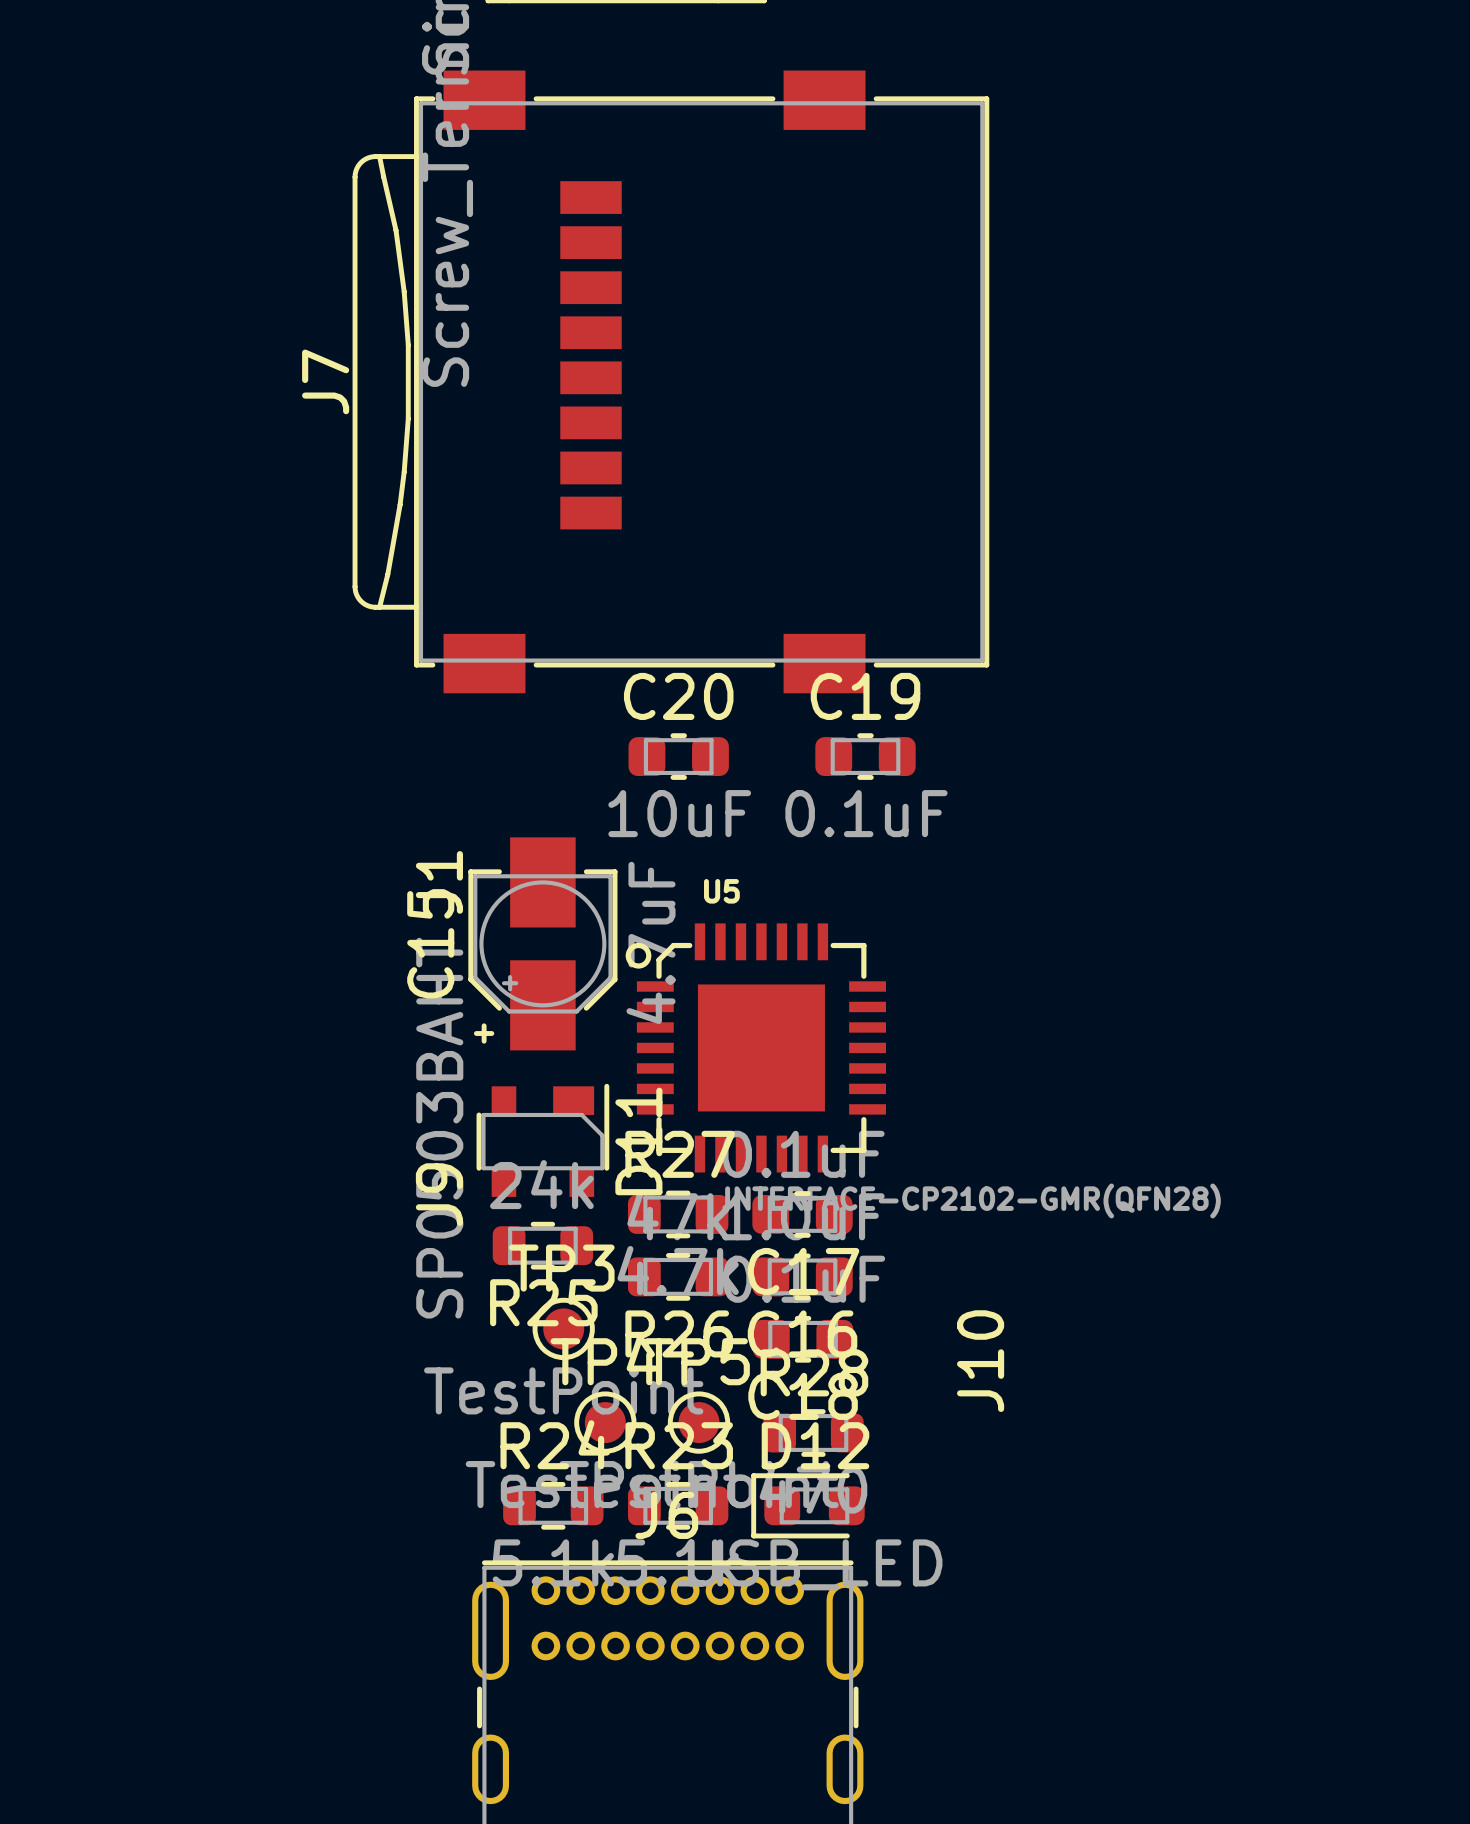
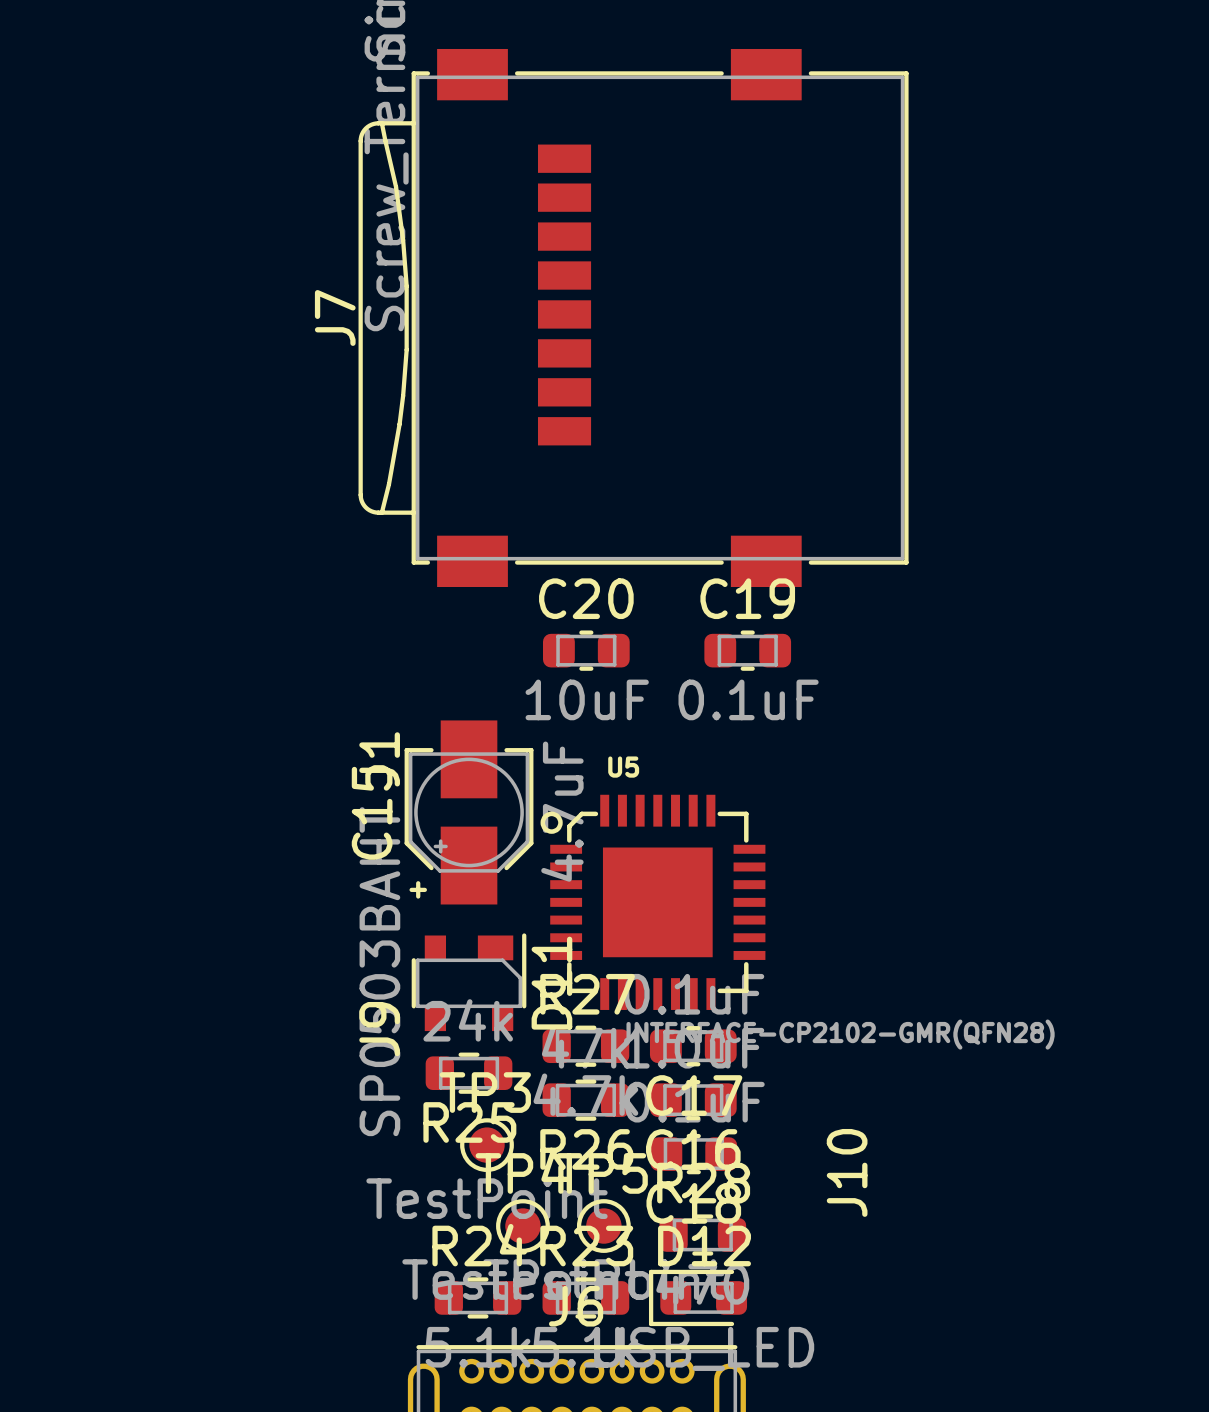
J7 position: (670, 381) -> (633, 317)

